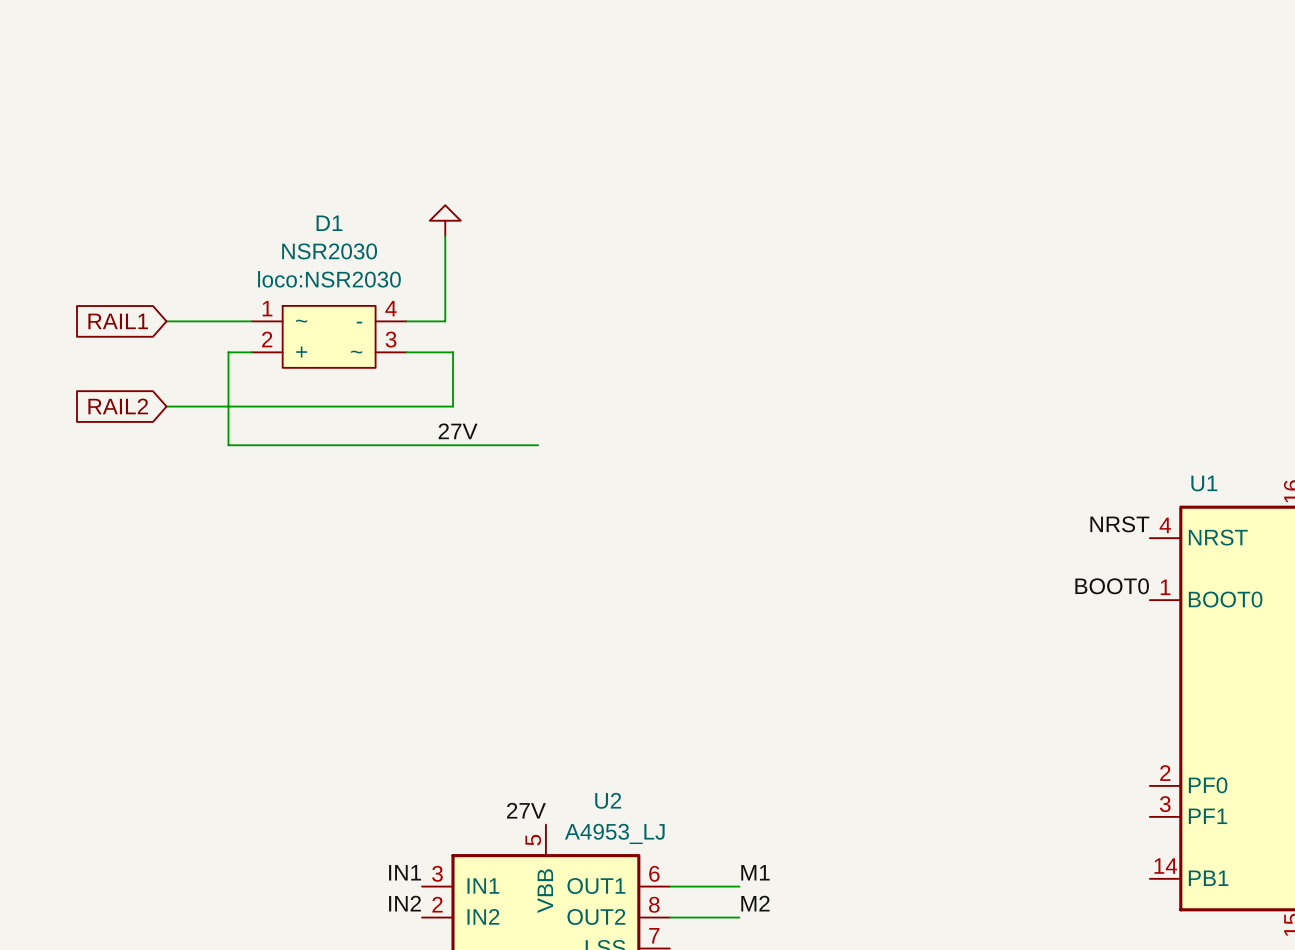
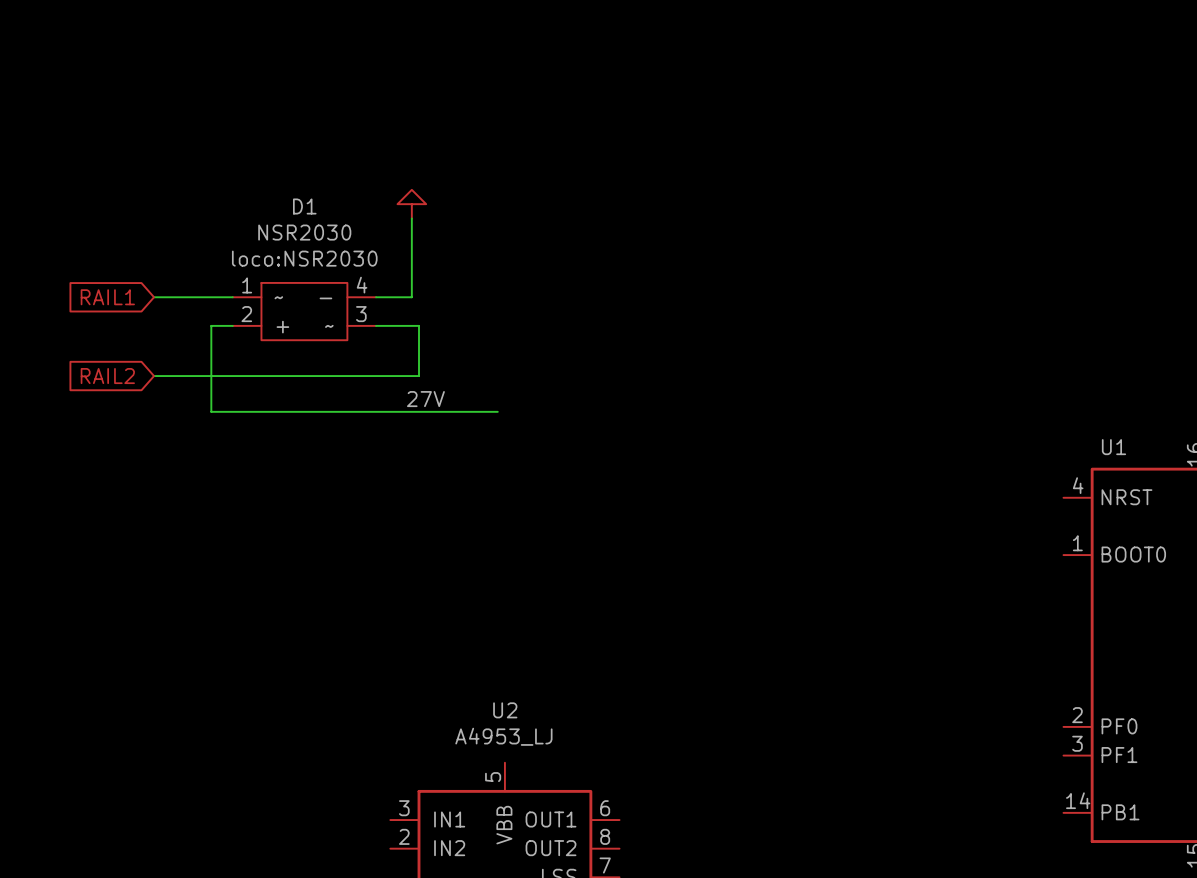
label: NRST (1119, 524) -> none
label: BOOT0 (1112, 586) -> none
U2 name position: U2 (608, 800) -> U2 (505, 710)
label: 27V (526, 810) -> none
U2 value position: A4953_LJ (614, 833) -> A4953_LJ (503, 736)
label: IN1 (405, 872) -> none
label: M1 (755, 872) -> none
wire: (669, 886) (739, 886) -> none
label: IN2 (405, 903) -> none
label: M2 (755, 903) -> none
wire: (669, 917) (739, 917) -> none

